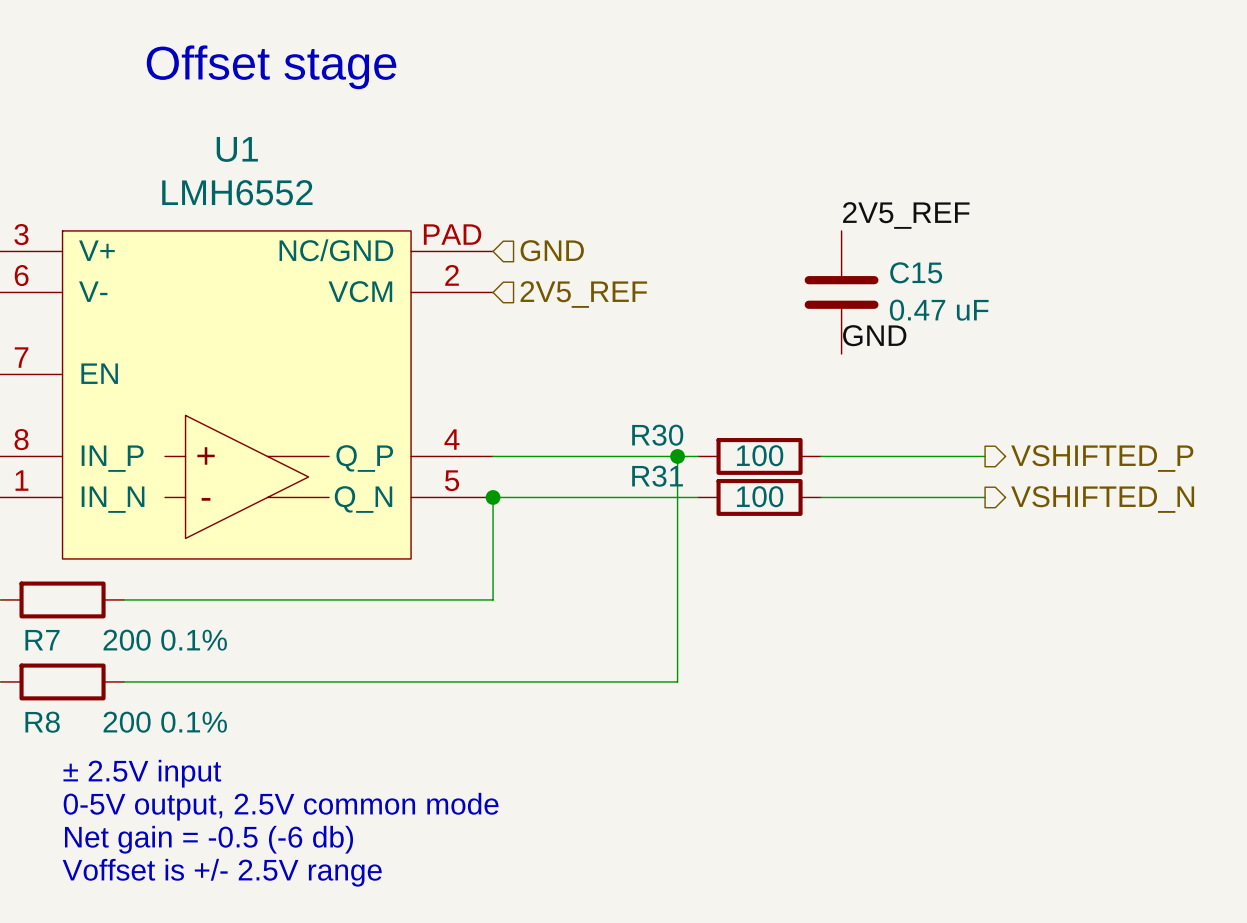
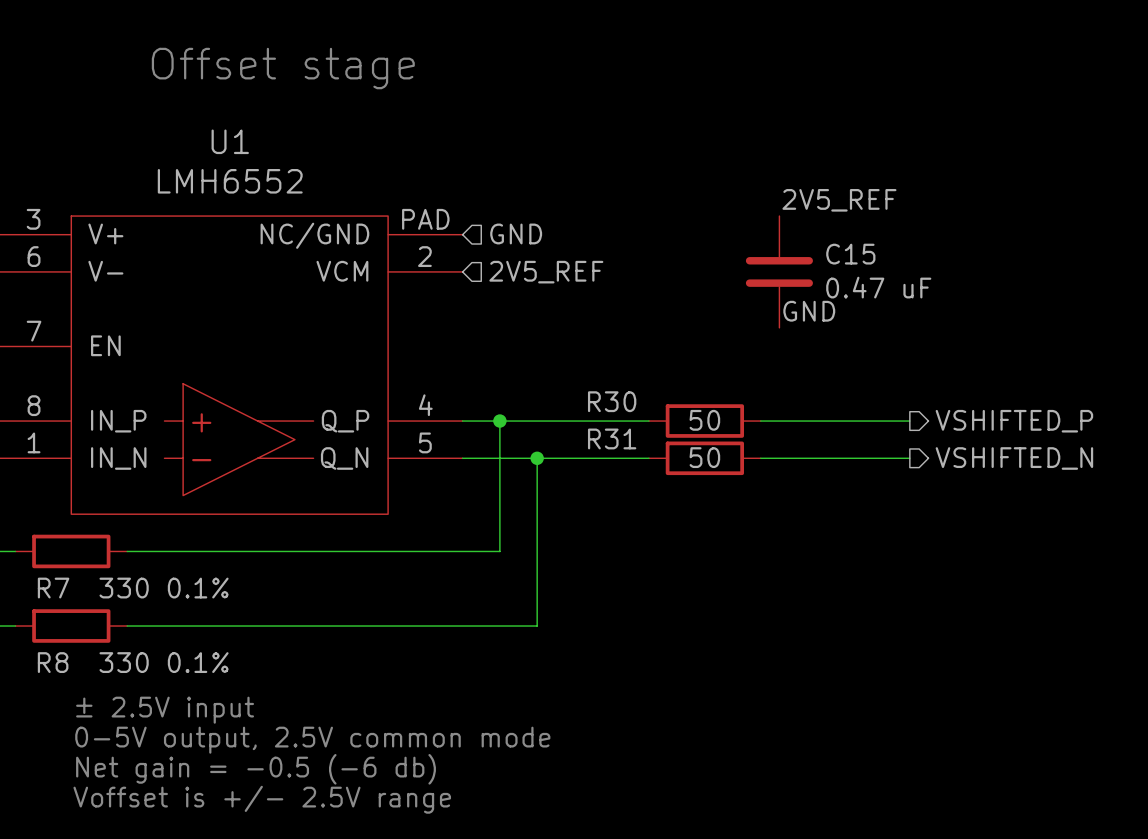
R30 value: 100 (760, 455) -> 50 (704, 420)
junction: none -> (499, 421)
wire: (677, 456) (677, 681) (575, 681) -> (537, 458) (537, 626)
junction: (677, 456) -> none
R31 value: 100 (760, 496) -> 50 (704, 457)
wire: (493, 497) (493, 599) -> (499, 421) (499, 551) (462, 551)
junction: (493, 497) -> none
junction: none -> (537, 458)
R7 value: 200 0.1% (165, 640) -> 330 0.1% (164, 588)
R8 value: 200 0.1% (165, 722) -> 330 0.1% (164, 662)

